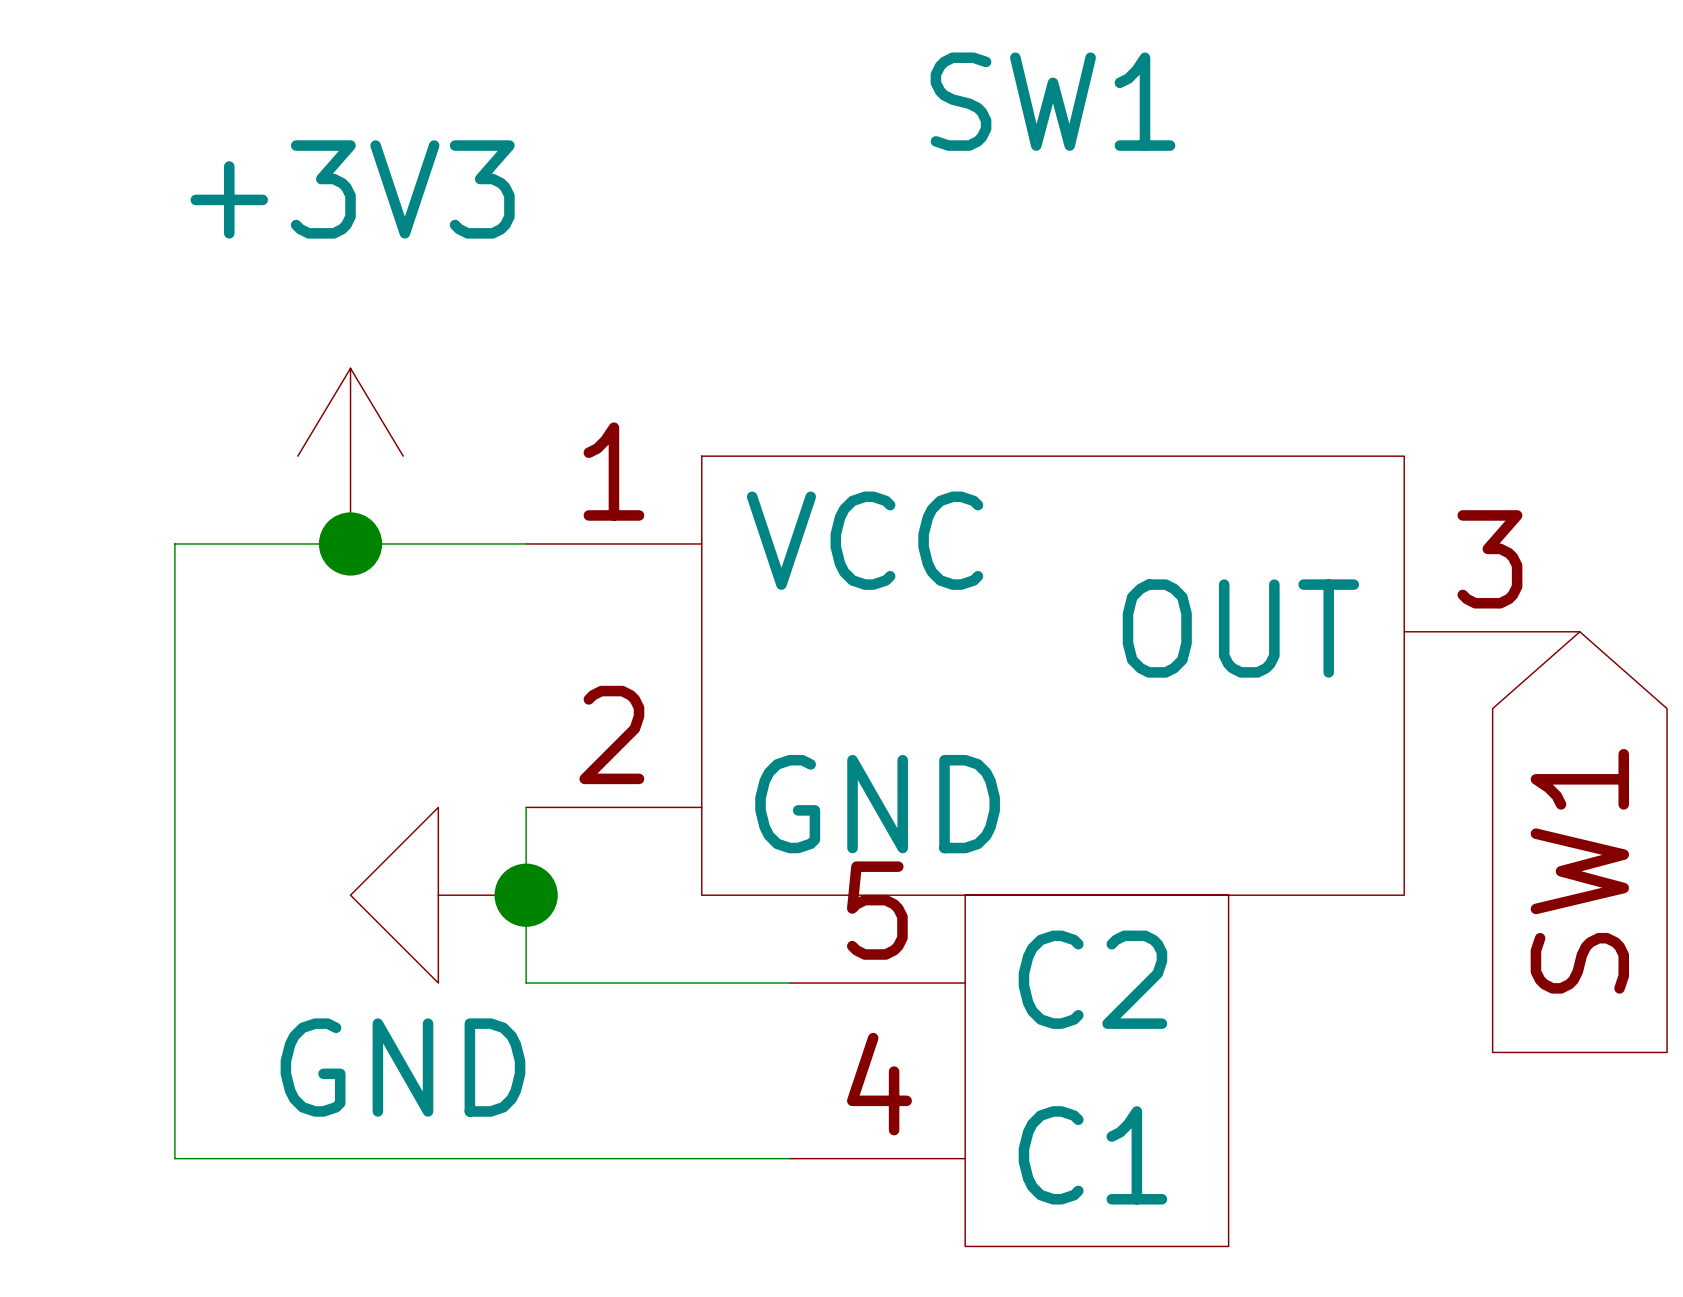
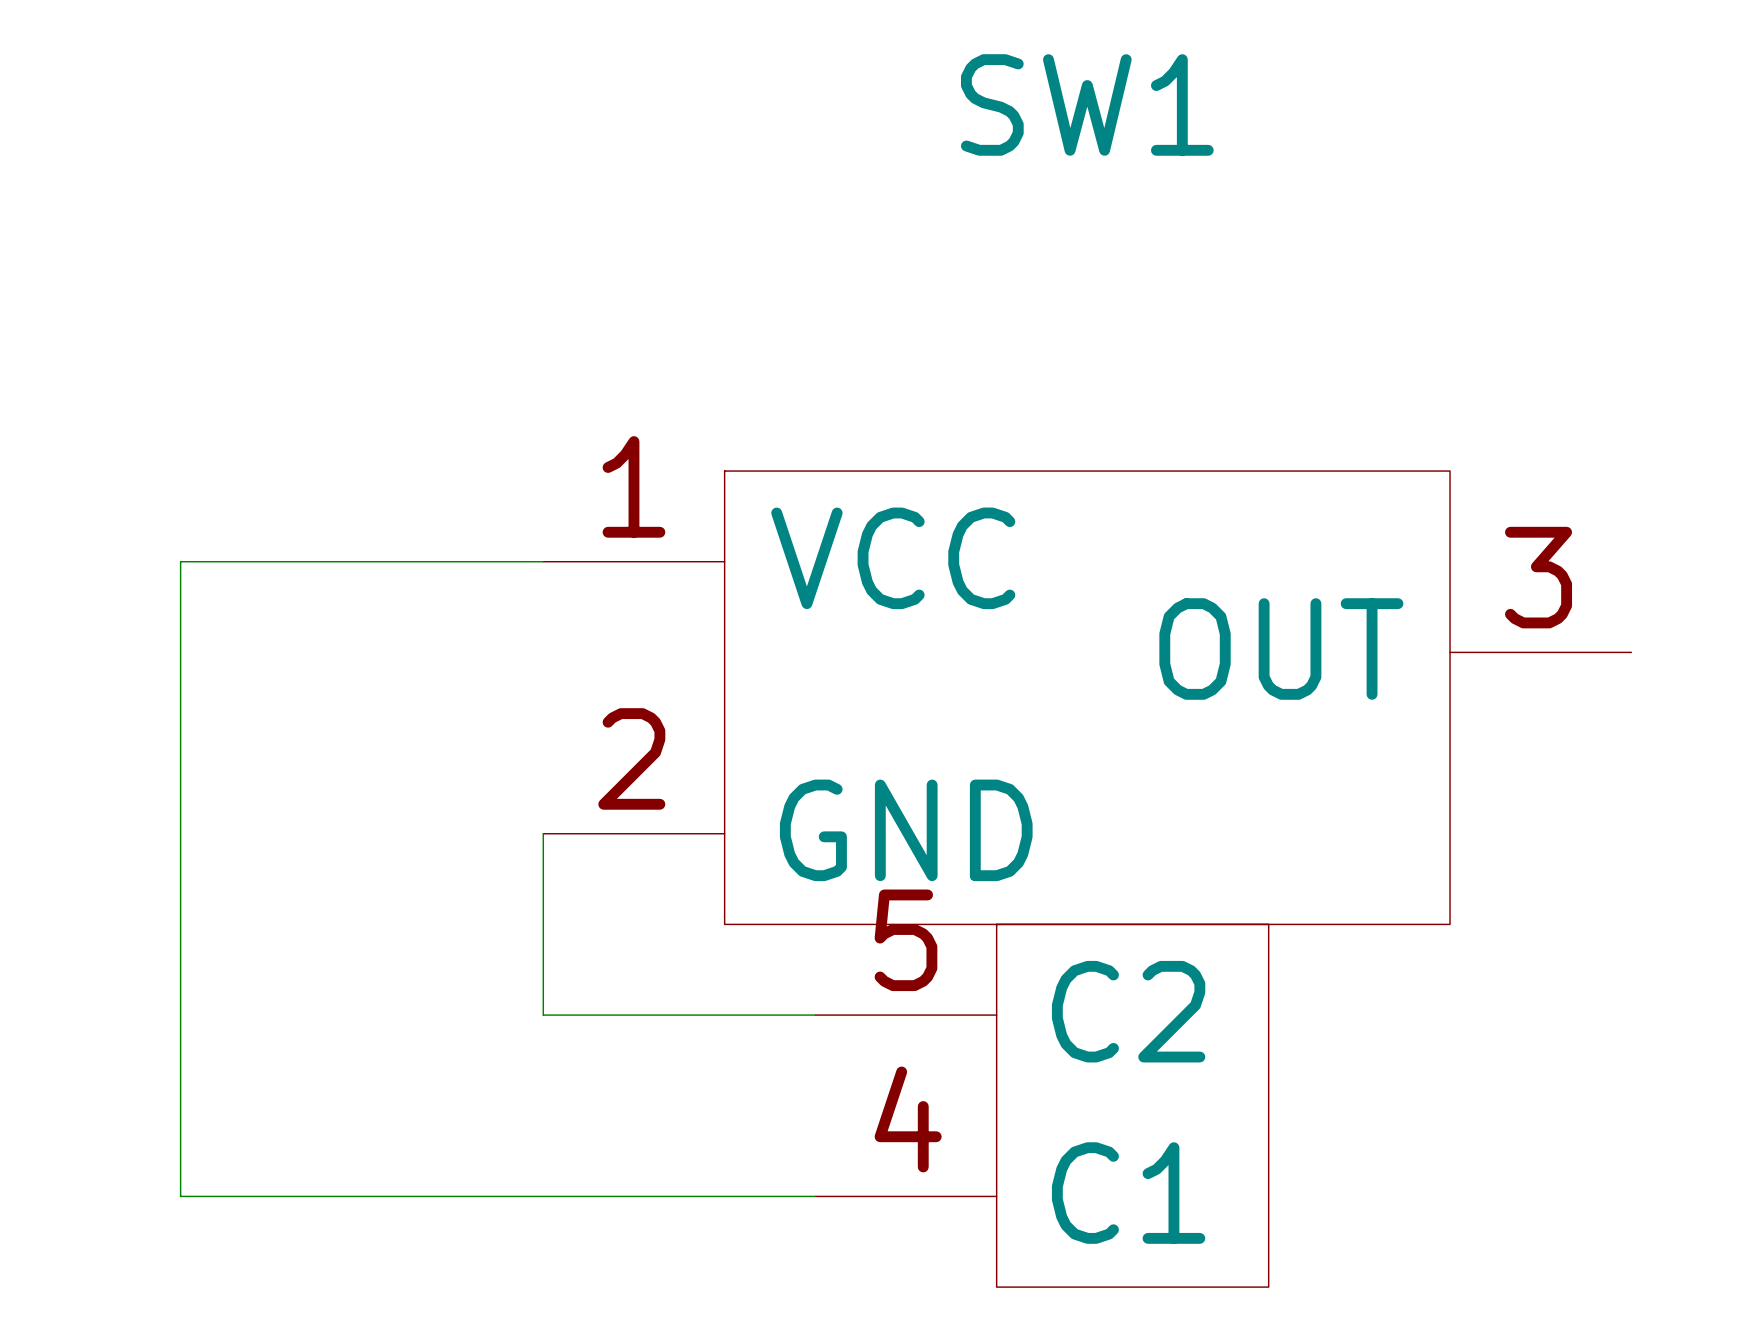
power symbol: +3V3 (350, 456) -> none
junction: (350, 543) -> none
global label: SW1 (1579, 871) -> none
power symbol: GND (438, 895) -> none
junction: (526, 895) -> none

